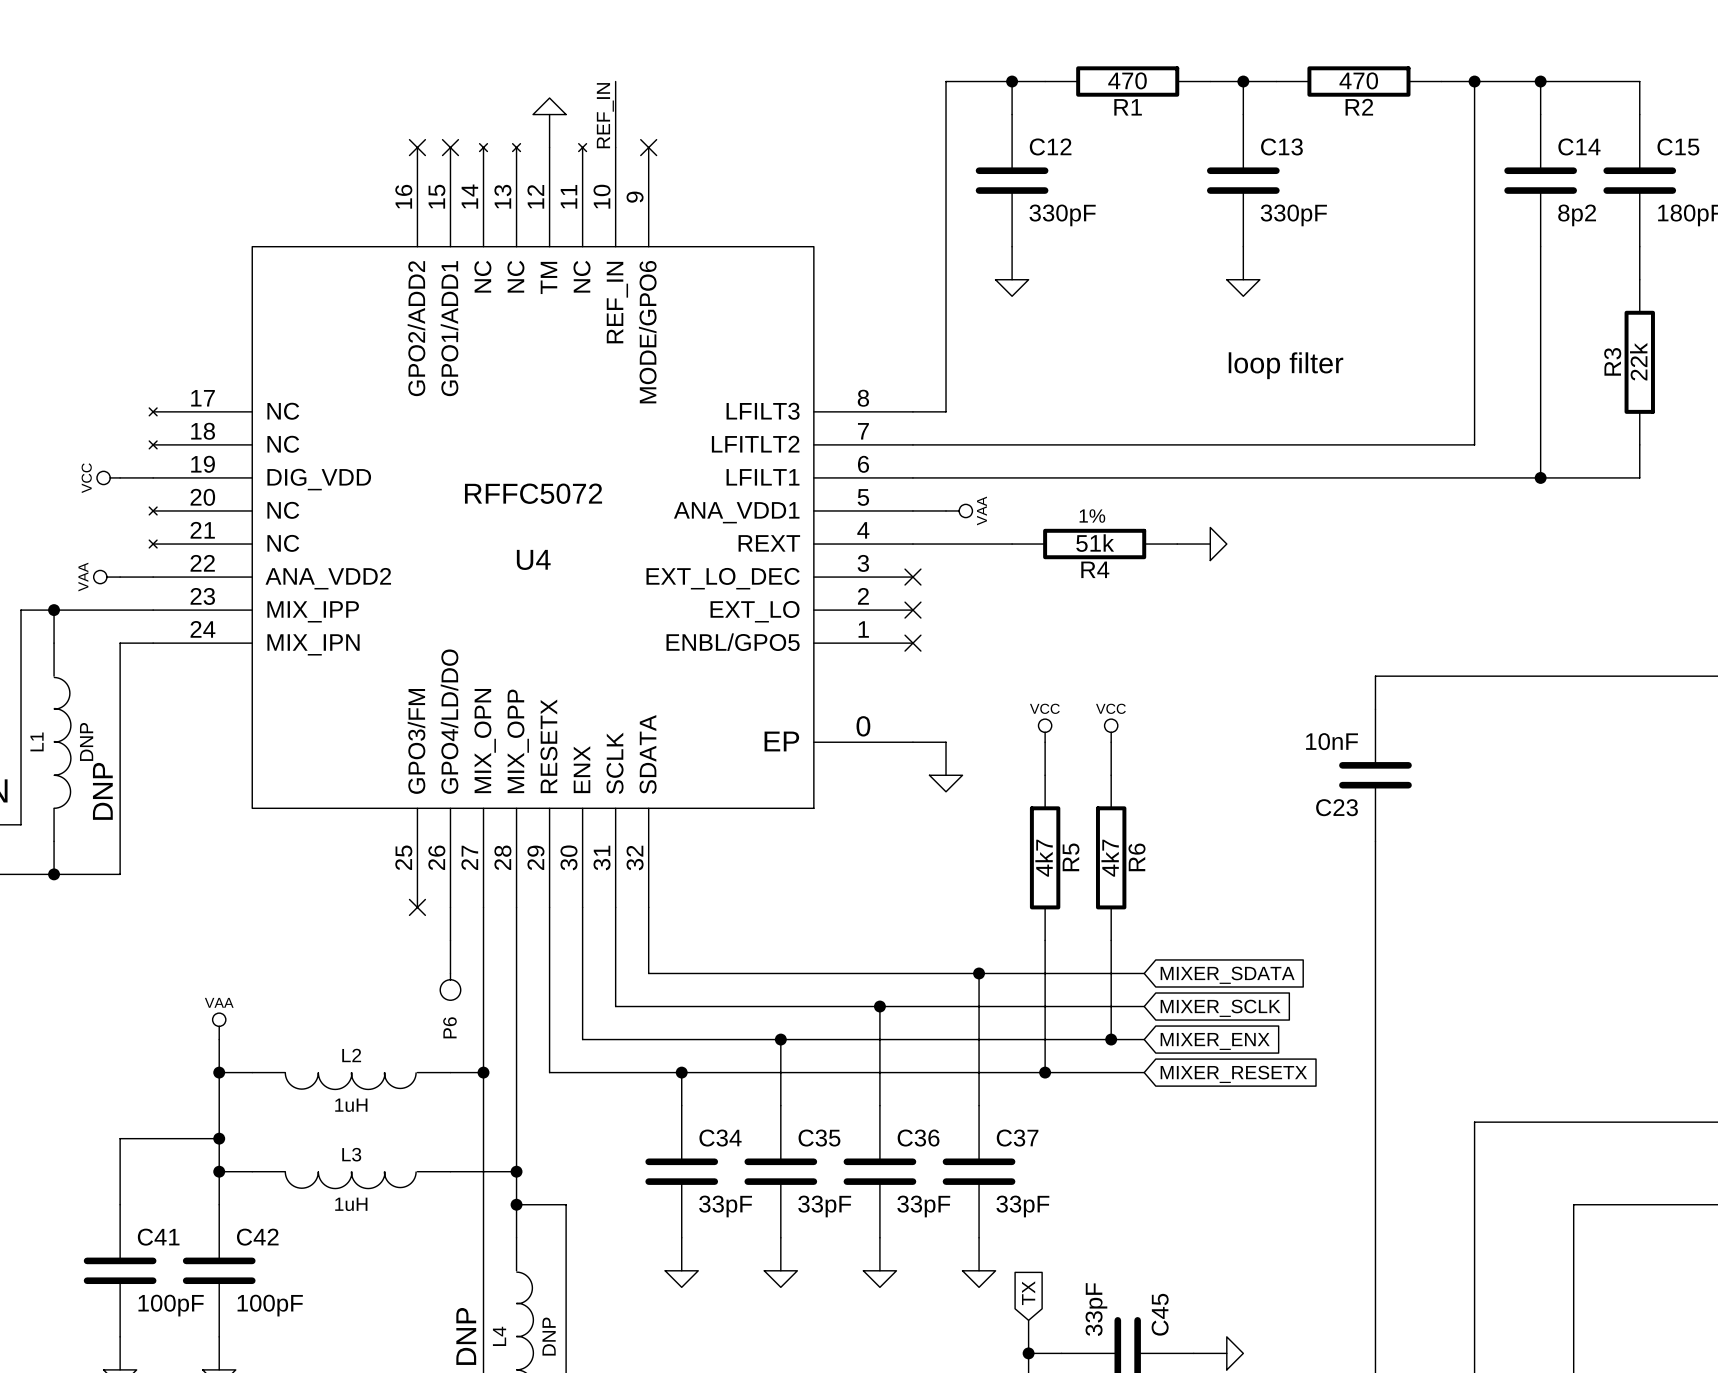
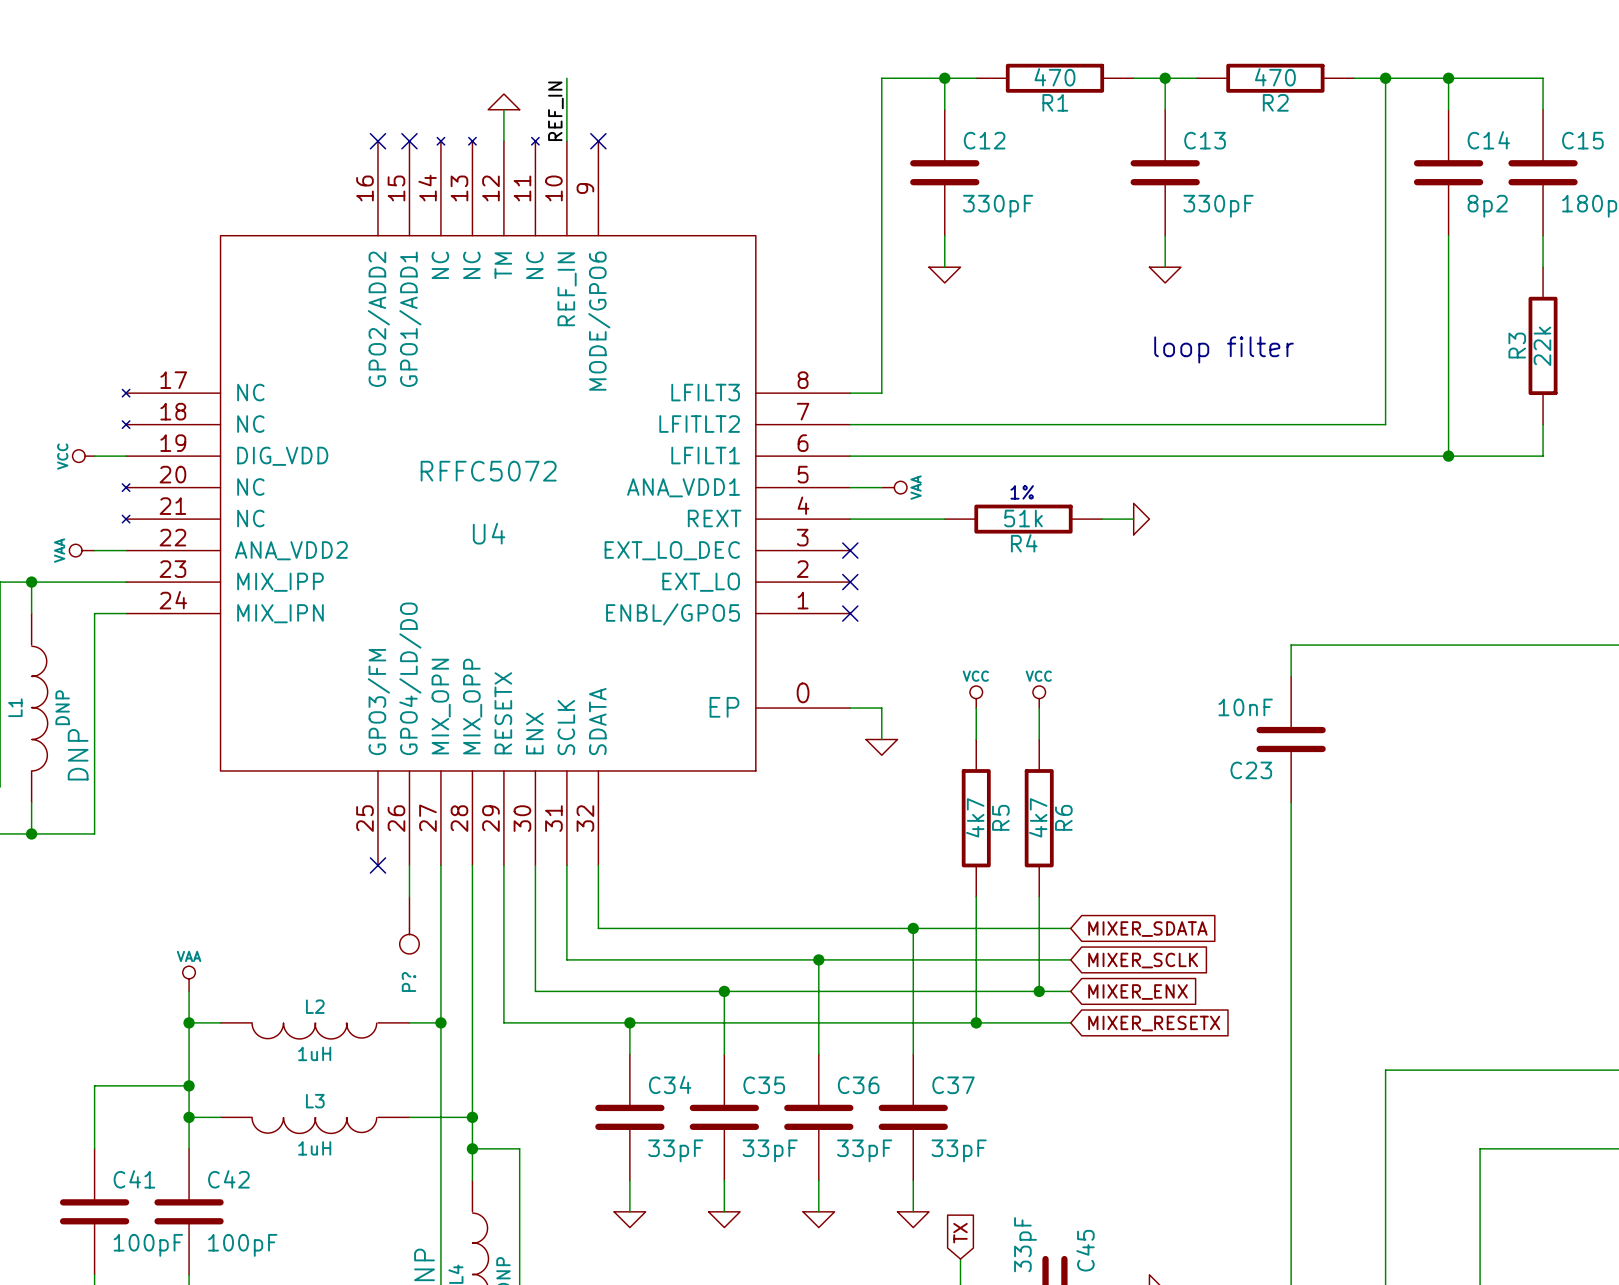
P6 name: P6 (449, 1027) -> P? (409, 982)

